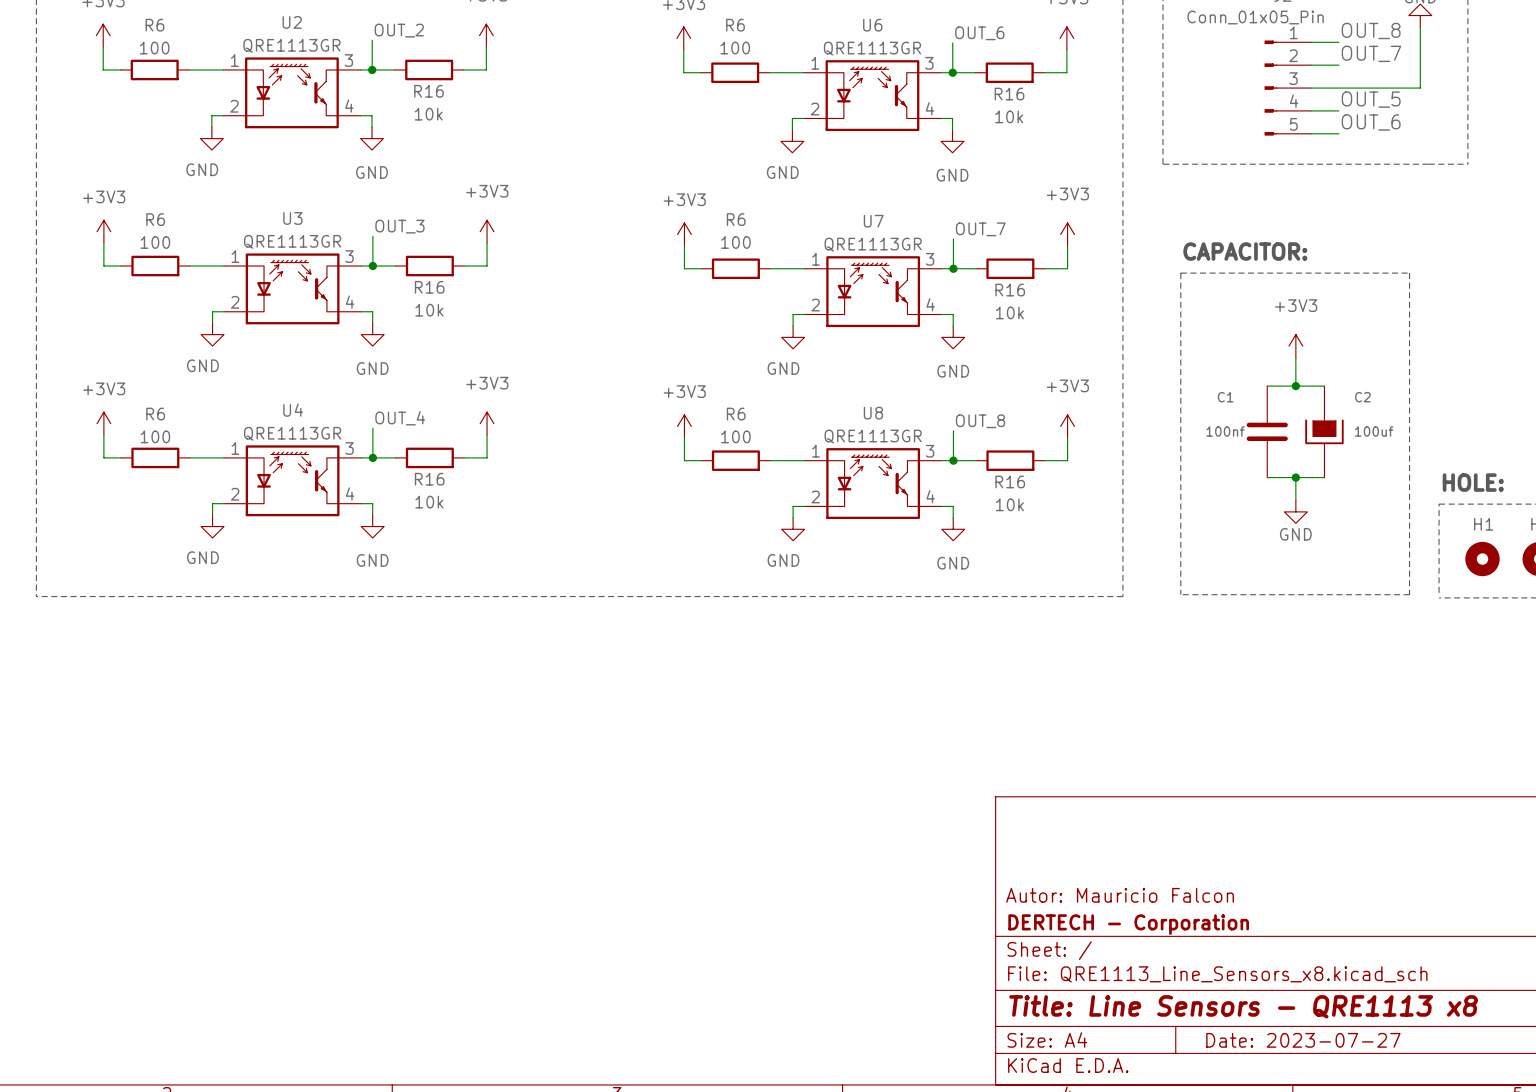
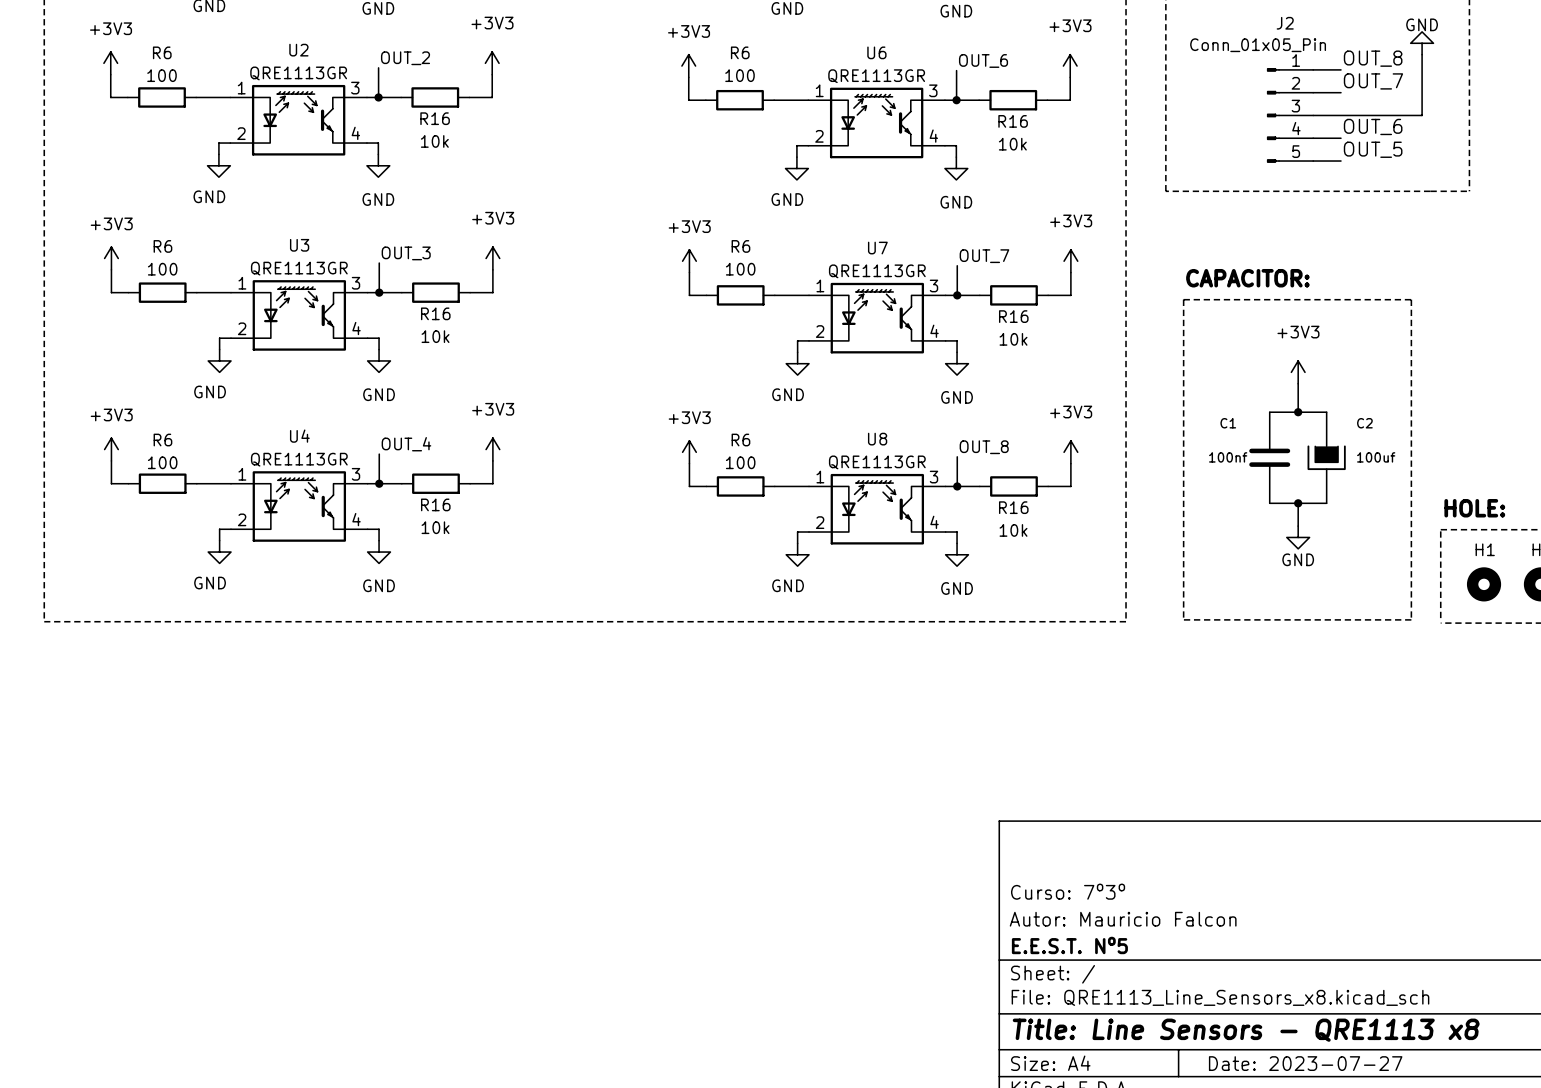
label: OUT_5 (1371, 99) -> OUT_6 (1373, 126)
label: OUT_6 (1371, 122) -> OUT_5 (1373, 149)
title block: none -> Curso: 7º3º (1068, 891)
title block: DERTECH - Corporation (1128, 924) -> E.E.S.T. Nº5 (1069, 945)

